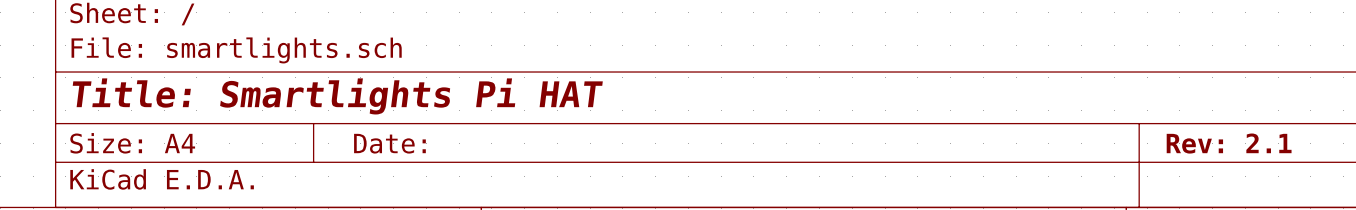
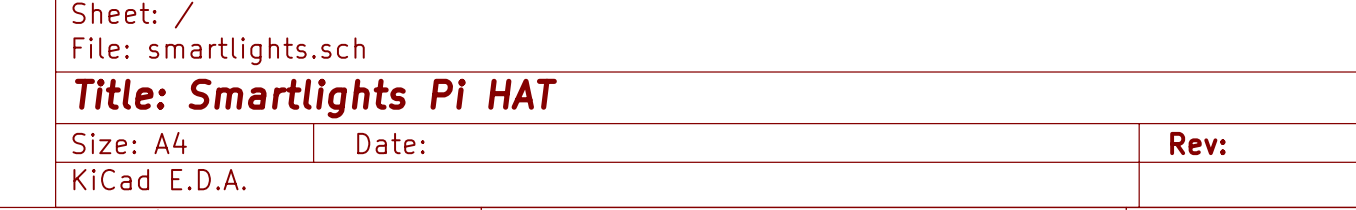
title block: Rev: 2.1 (1229, 143) -> Rev: (1197, 143)

